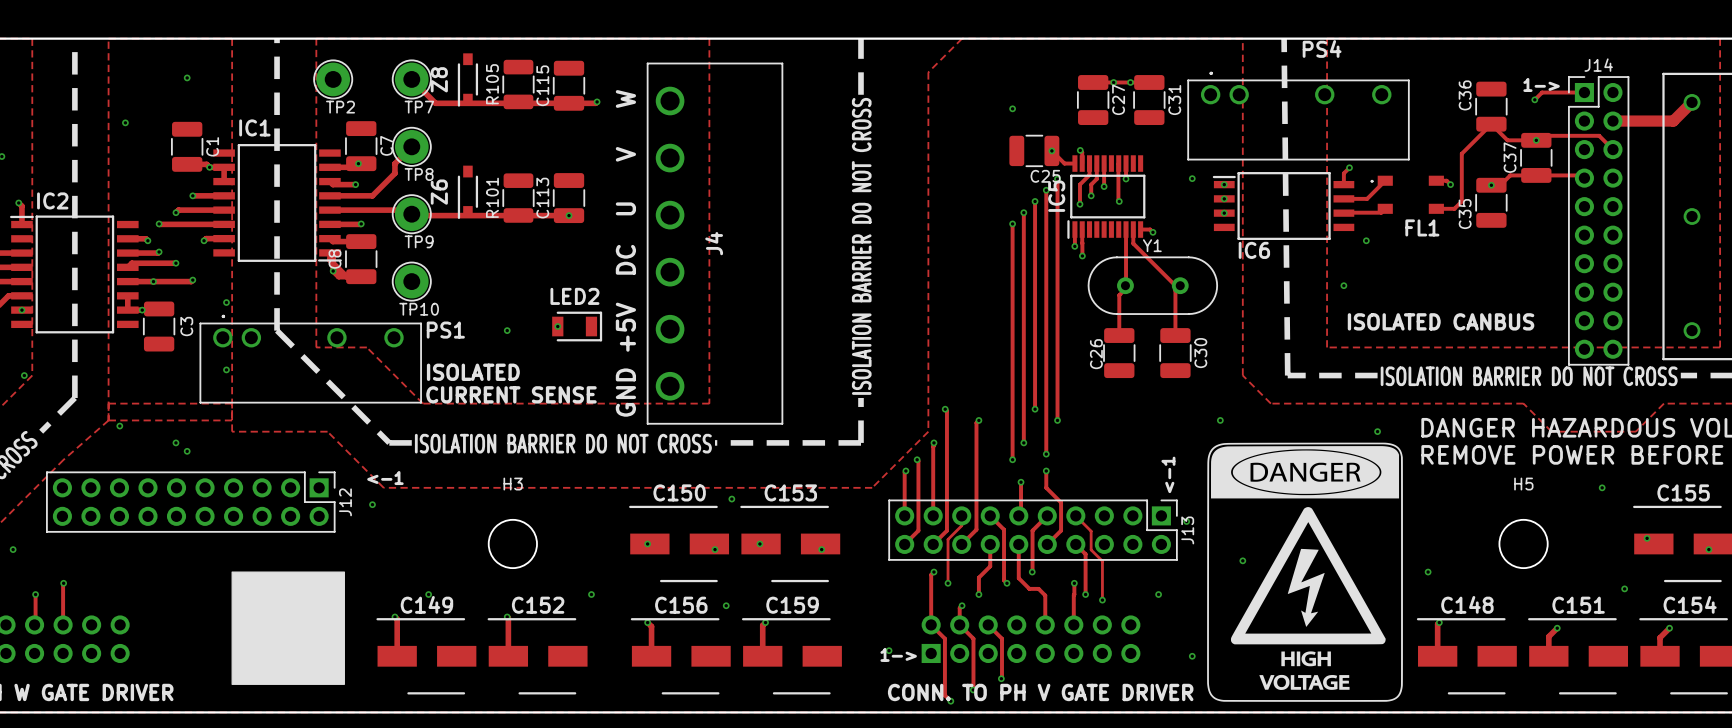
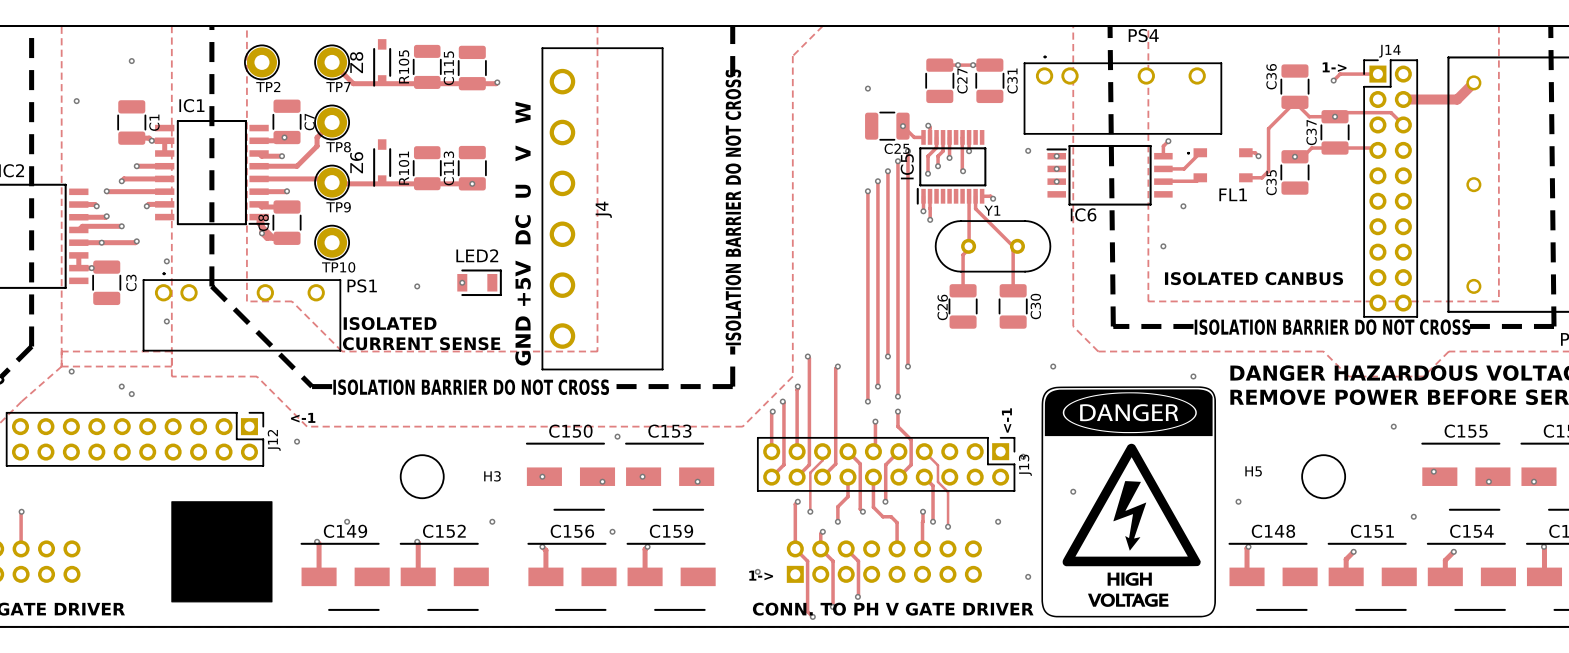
H3 name position: H3 (513, 484) -> H3 (492, 476)
H5 name position: H5 (1523, 484) -> H5 (1253, 471)

